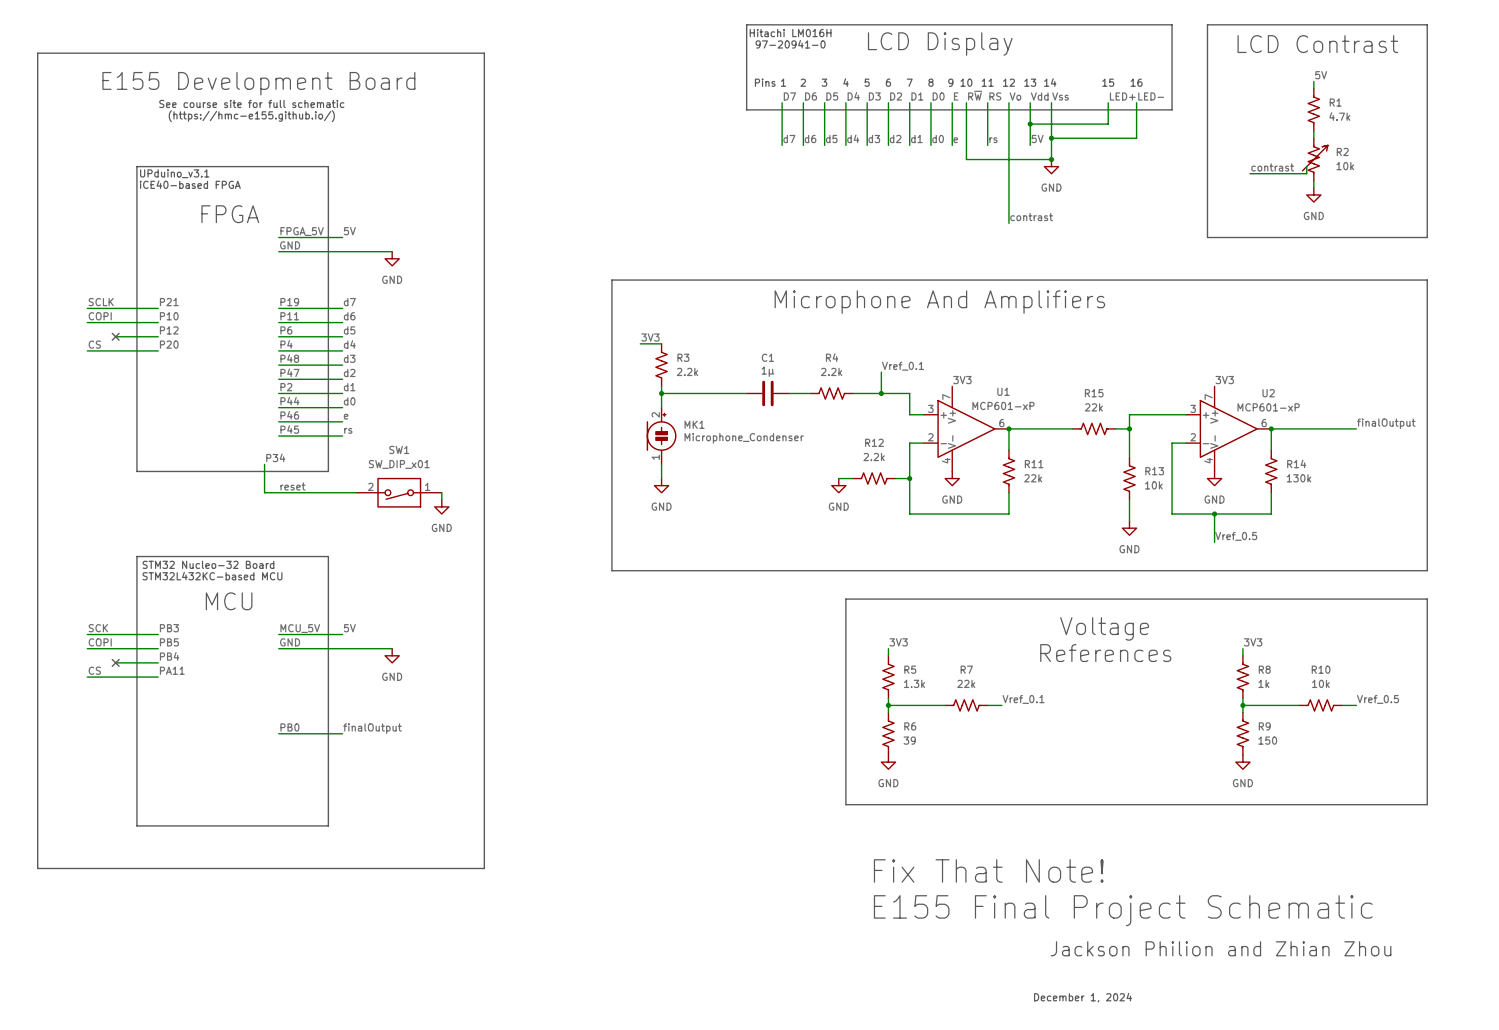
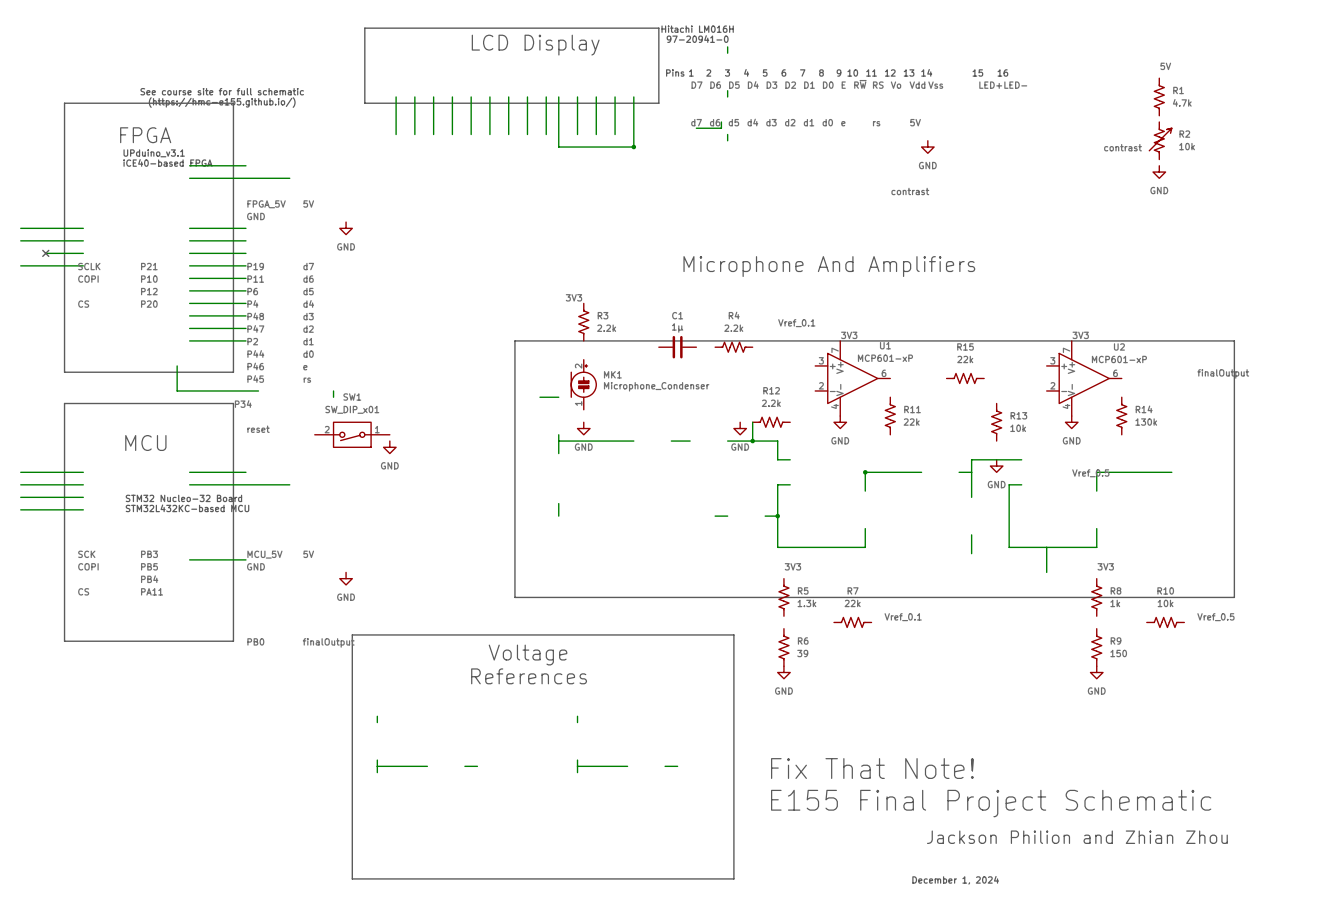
line: (1207, 24) (1427, 24) (1427, 237) (1207, 237) (1207, 24) -> none
line: (746, 31) (746, 24) (1172, 24) (1172, 109) (746, 109) -> (658, 28) (364, 28) (364, 103) (658, 103) (658, 96)
text: LCD Display (940, 44) -> none
text: LCD Contrast (1317, 44) -> none
text: none -> LCD Display (535, 45)
line: (37, 53) (484, 53) (484, 868) (37, 868) (37, 53) -> none
wire: none -> (727, 46) (727, 53)
wire: (1313, 81) (1313, 88) -> none
text: E155 Development Board (258, 83) -> none
wire: (782, 102) (782, 145) -> (596, 96) (596, 134)
wire: (803, 102) (803, 145) -> (615, 96) (615, 134)
wire: (845, 102) (845, 145) -> none
wire: (867, 102) (867, 145) -> none
wire: (888, 102) (888, 145) -> none
wire: (909, 102) (909, 145) -> none
wire: (930, 102) (930, 145) -> none
wire: (952, 102) (952, 145) -> none
wire: (966, 102) (966, 159) (1051, 159) (1051, 102) -> none
wire: (987, 102) (987, 145) -> none
wire: (1008, 102) (1008, 223) -> none
wire: (1030, 102) (1030, 145) -> none
wire: (1108, 102) (1108, 124) (1030, 124) -> none
wire: (1136, 102) (1136, 138) (1051, 138) -> none
wire: none -> (396, 96) (396, 134)
wire: none -> (414, 96) (414, 134)
wire: none -> (433, 96) (433, 134)
wire: none -> (452, 96) (452, 134)
wire: none -> (471, 96) (471, 134)
wire: none -> (489, 96) (489, 134)
wire: none -> (508, 96) (508, 134)
wire: none -> (527, 96) (527, 134)
wire: none -> (546, 96) (546, 134)
wire: none -> (558, 96) (558, 147) (633, 147) (633, 96)
wire: none -> (577, 96) (577, 134)
wire: (824, 109) (824, 145) -> none
junction: (1030, 124) -> none
wire: (1313, 131) (1313, 138) -> none
wire: none -> (721, 121) (721, 128) (696, 128)
junction: (1051, 138) -> none
wire: none -> (727, 134) (727, 140)
junction: (1051, 159) -> none
line: (136, 166) (328, 166) (328, 471) (136, 471) (136, 166) -> (64, 103) (233, 103) (233, 372) (64, 372) (64, 103)
junction: none -> (633, 147)
wire: (1306, 166) (1306, 173) (1250, 173) -> none
wire: (1313, 180) (1313, 187) -> none
text position: FPGA (230, 214) -> FPGA (145, 135)
wire: (278, 237) (342, 237) -> (189, 165) (245, 165)
wire: (278, 251) (392, 251) -> (189, 178) (289, 178)
line: (611, 280) (1427, 280) (1427, 570) (611, 570) (611, 280) -> (514, 340) (1234, 340) (1234, 597) (514, 597) (514, 340)
no-connect mark: none -> (45, 253)
wire: (87, 308) (158, 308) -> (20, 228) (83, 228)
wire: (278, 308) (342, 308) -> (189, 228) (245, 228)
wire: (87, 322) (158, 322) -> (20, 240) (83, 240)
wire: (278, 322) (342, 322) -> (189, 240) (245, 240)
wire: (115, 336) (158, 336) -> (45, 253) (83, 253)
no-connect mark: (115, 336) -> none
wire: (278, 336) (342, 336) -> (189, 253) (245, 253)
wire: (640, 343) (661, 343) -> (539, 397) (558, 397)
wire: (87, 350) (158, 350) -> (20, 265) (83, 265)
wire: (278, 350) (342, 350) -> (189, 265) (245, 265)
wire: (278, 365) (342, 365) -> (189, 278) (245, 278)
wire: (881, 372) (881, 393) -> none
wire: (278, 379) (342, 379) -> (189, 290) (245, 290)
wire: (661, 386) (661, 407) -> (558, 434) (558, 453)
wire: (278, 393) (342, 393) -> (189, 303) (245, 303)
wire: (661, 393) (746, 393) -> (558, 441) (633, 441)
junction: (661, 393) -> none
wire: (789, 393) (810, 393) -> (671, 441) (690, 441)
wire: (852, 393) (909, 393) (909, 414) (923, 414) -> (727, 441) (777, 441) (777, 459) (790, 459)
junction: (881, 393) -> none
wire: (278, 407) (342, 407) -> (189, 315) (245, 315)
wire: (1186, 414) (1129, 414) (1129, 457) -> (1021, 459) (971, 459) (971, 497)
wire: (278, 421) (342, 421) -> (189, 328) (245, 328)
junction: (1008, 428) -> none
wire: (1072, 428) (1008, 428) (1008, 450) -> (921, 472) (865, 472) (865, 491)
wire: (1115, 428) (1129, 428) -> (959, 472) (971, 472)
junction: (1129, 428) -> none
junction: (1271, 428) -> none
wire: (1356, 428) (1271, 428) (1271, 450) -> (1171, 472) (1096, 472) (1096, 491)
wire: (278, 436) (342, 436) -> (189, 340) (245, 340)
wire: (923, 443) (909, 443) (909, 514) (1008, 514) (1008, 492) -> (790, 484) (777, 484) (777, 547) (865, 547) (865, 528)
wire: (1186, 443) (1172, 443) (1172, 514) (1271, 514) (1271, 492) -> (1021, 484) (1009, 484) (1009, 547) (1096, 547) (1096, 528)
wire: (264, 464) (264, 492) (356, 492) -> (177, 365) (177, 390) (258, 390)
wire: (661, 464) (661, 478) -> (558, 503) (558, 516)
wire: (838, 478) (852, 478) -> (752, 441) (752, 422)
wire: (895, 478) (909, 478) -> (765, 516) (777, 516)
junction: (909, 478) -> none
wire: (441, 492) (441, 499) -> (333, 390) (333, 397)
junction: none -> (752, 441)
wire: (1129, 499) (1129, 521) -> (971, 534) (971, 553)
wire: (1214, 514) (1214, 542) -> (1046, 547) (1046, 572)
junction: (1214, 514) -> none
wire: none -> (189, 472) (245, 472)
junction: none -> (865, 472)
line: (136, 556) (136, 825) (328, 825) (328, 556) (136, 556) -> (64, 403) (64, 641) (233, 641) (233, 403) (64, 403)
wire: none -> (20, 497) (83, 497)
wire: none -> (715, 516) (727, 516)
junction: none -> (777, 516)
line: (845, 599) (1427, 599) (1427, 804) (845, 804) (845, 599) -> none
text position: MCU (229, 601) -> MCU (145, 443)
text: Voltage (1104, 628) -> none
wire: (87, 634) (158, 634) -> (20, 472) (83, 472)
wire: (278, 634) (342, 634) -> (245, 559) (189, 559)
wire: (87, 648) (158, 648) -> (20, 484) (83, 484)
wire: (278, 648) (392, 648) -> (189, 484) (289, 484)
wire: (888, 648) (888, 655) -> none
wire: (1242, 648) (1242, 655) -> none
text: References (1105, 653) -> none
wire: (115, 662) (158, 662) -> none
no-connect mark: (115, 662) -> none
wire: (87, 677) (158, 677) -> (20, 509) (83, 509)
wire: (888, 698) (888, 712) -> none
wire: (1242, 698) (1242, 712) -> none
wire: (888, 705) (945, 705) -> none
junction: (888, 705) -> none
wire: (987, 705) (1001, 705) -> none
wire: (1242, 705) (1299, 705) -> none
junction: (1242, 705) -> none
wire: (1342, 705) (1356, 705) -> none
line: none -> (352, 634) (733, 634) (733, 878) (352, 878) (352, 634)
wire: (278, 733) (342, 733) -> none
text: none -> Voltage (528, 655)
text: none -> References (529, 676)
wire: none -> (377, 716) (377, 722)
wire: none -> (577, 716) (577, 722)
wire: none -> (377, 760) (377, 772)
wire: none -> (577, 760) (577, 772)
wire: none -> (464, 766) (477, 766)
wire: none -> (577, 766) (627, 766)
wire: none -> (665, 766) (677, 766)

